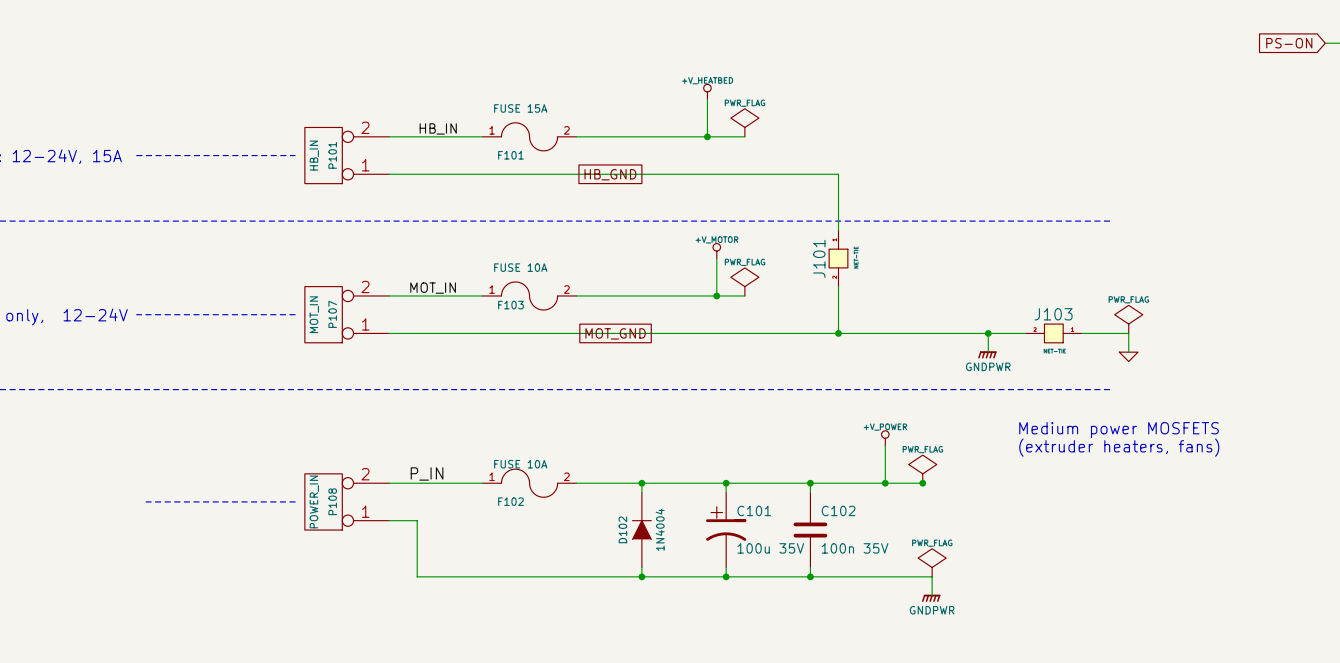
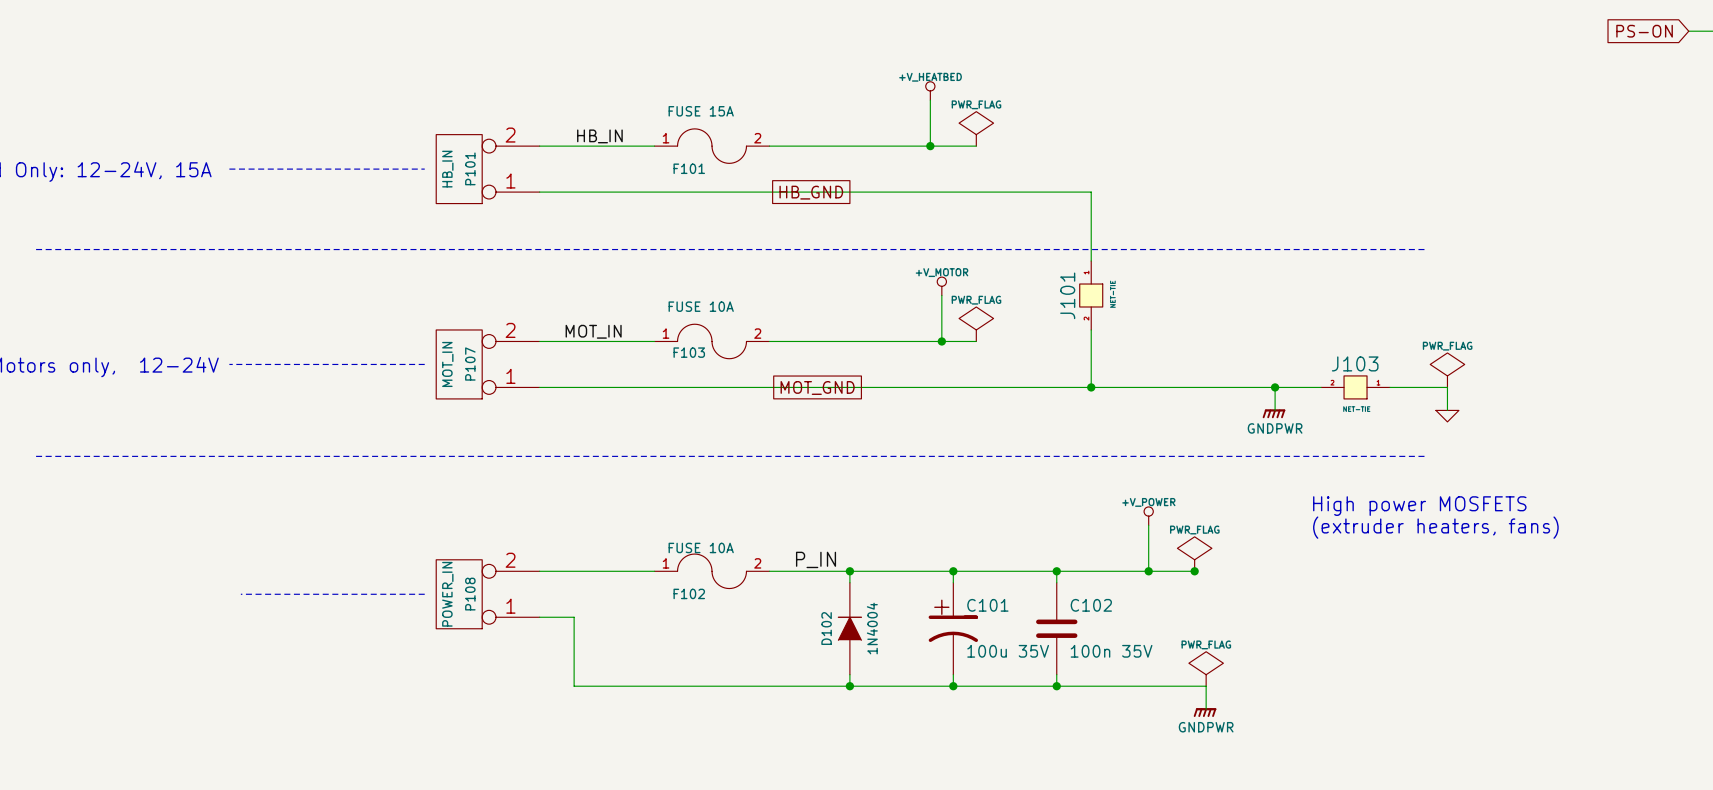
text: Medium power MOSFETS (1119, 430) -> High power MOSFETS (1419, 506)
label: P_IN (427, 473) -> none
label: none -> P_IN (816, 559)

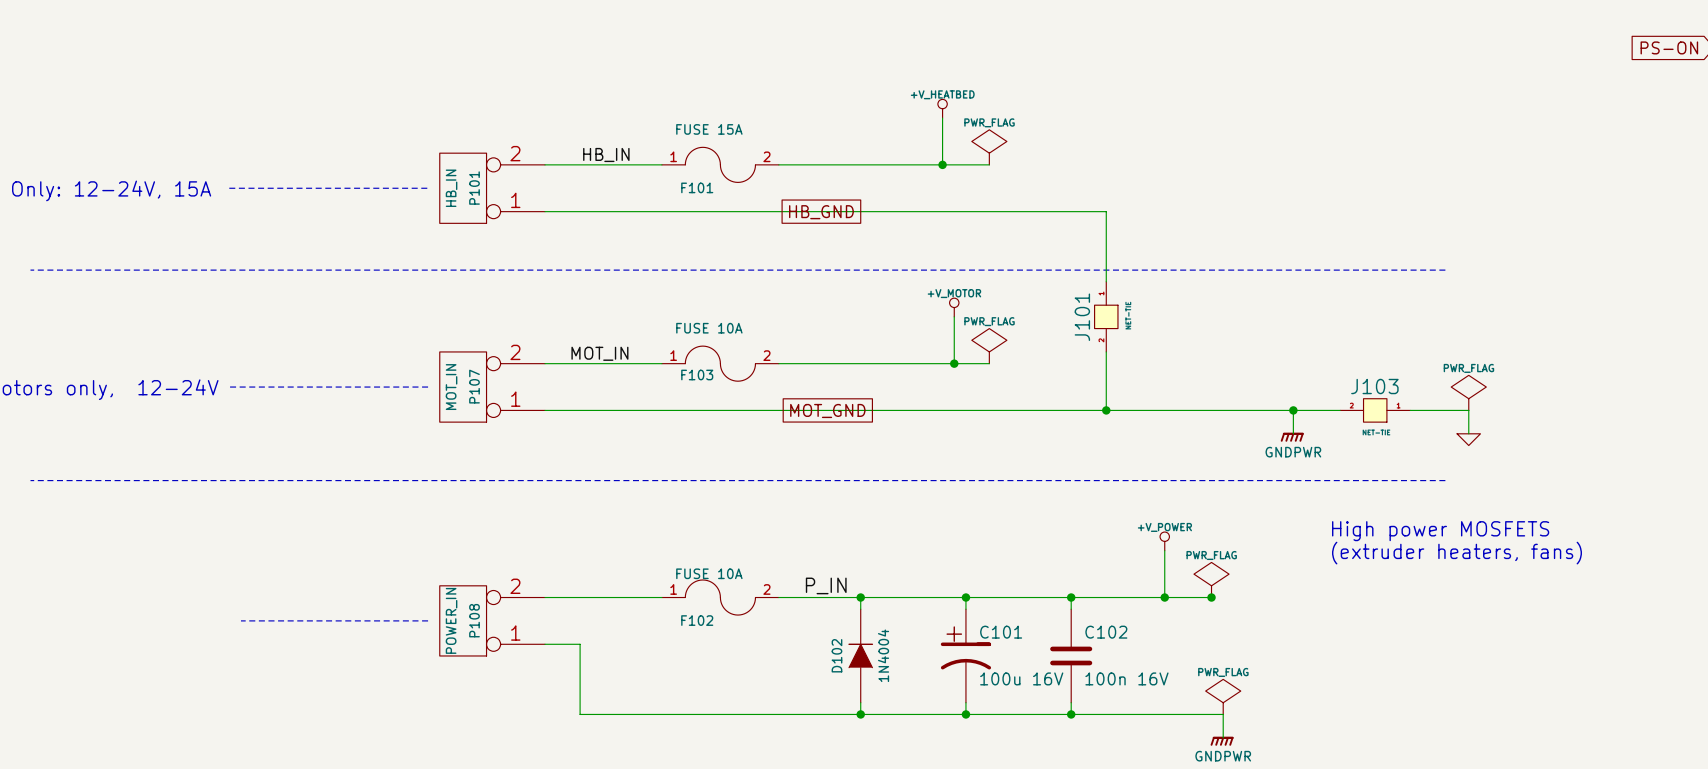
C101 value: 100u 35V (1008, 651) -> 100u 16V (1021, 678)
C102 value: 100n 35V (1111, 651) -> 100n 16V (1126, 678)

